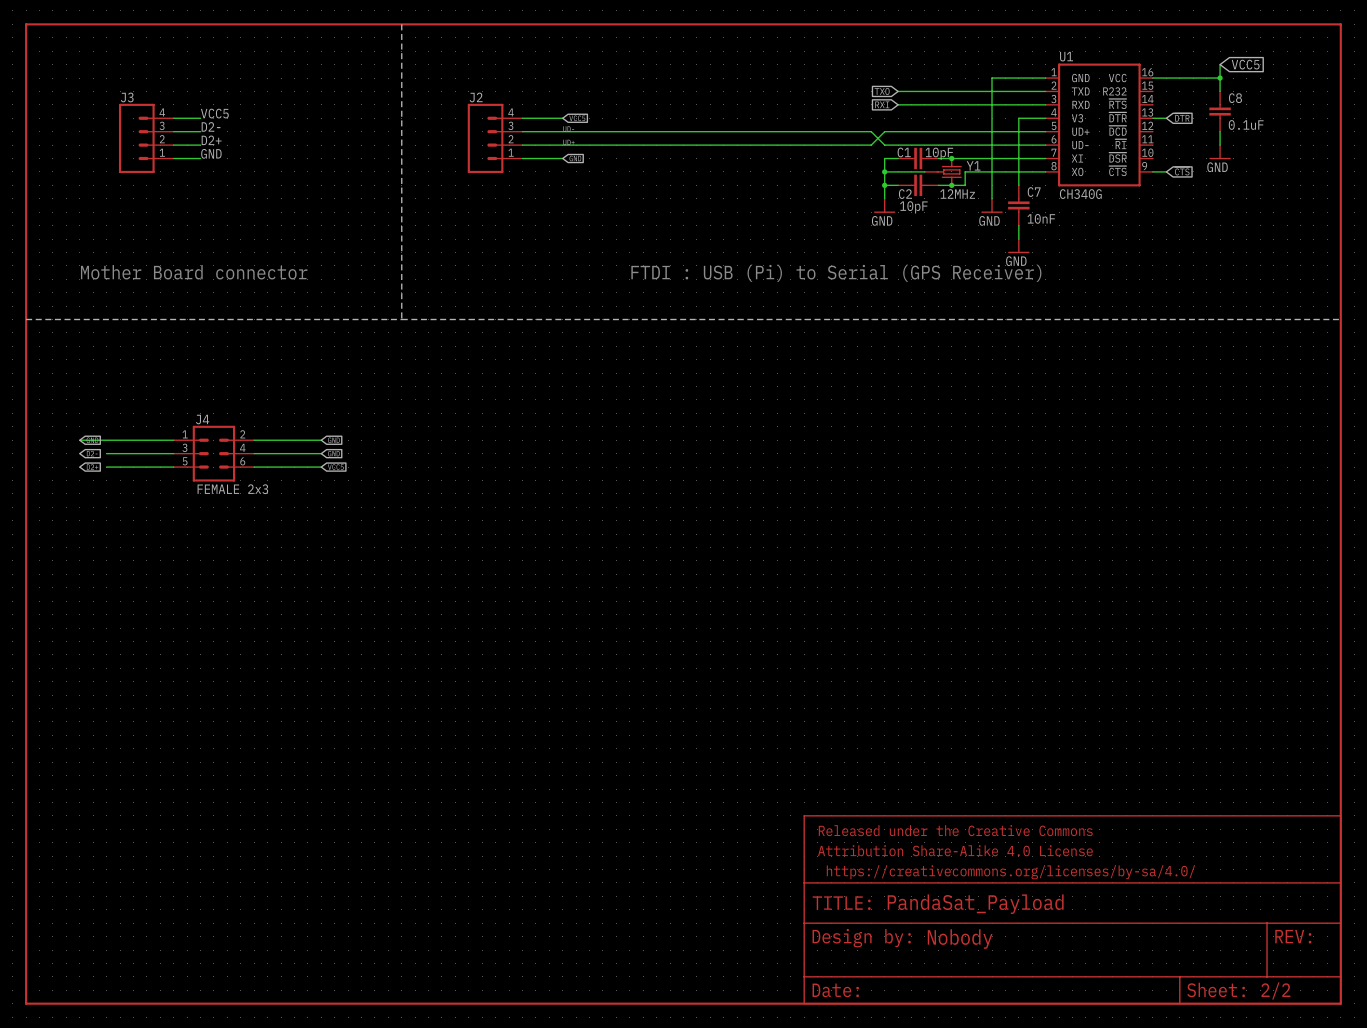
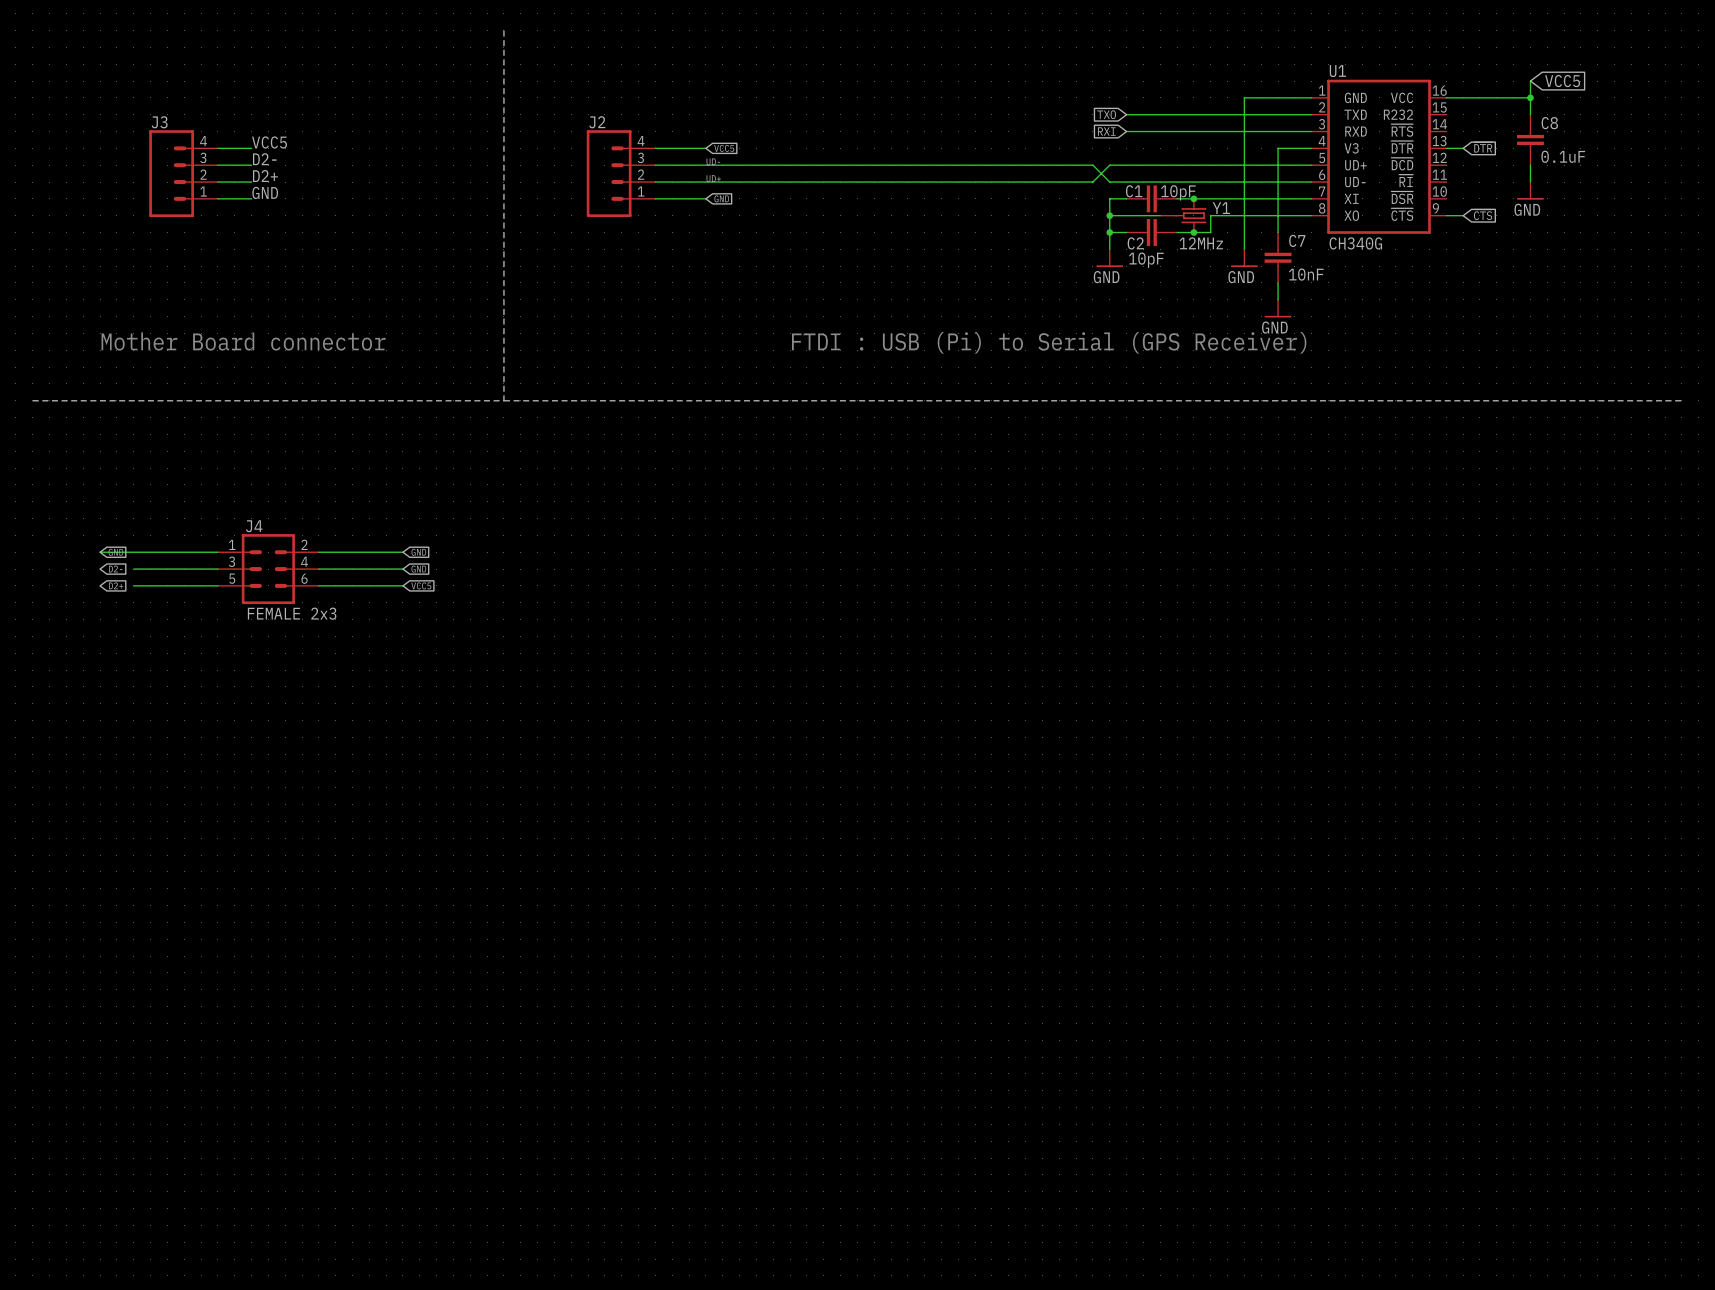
part: (683, 514) -> none
part: (1072, 909) -> none

